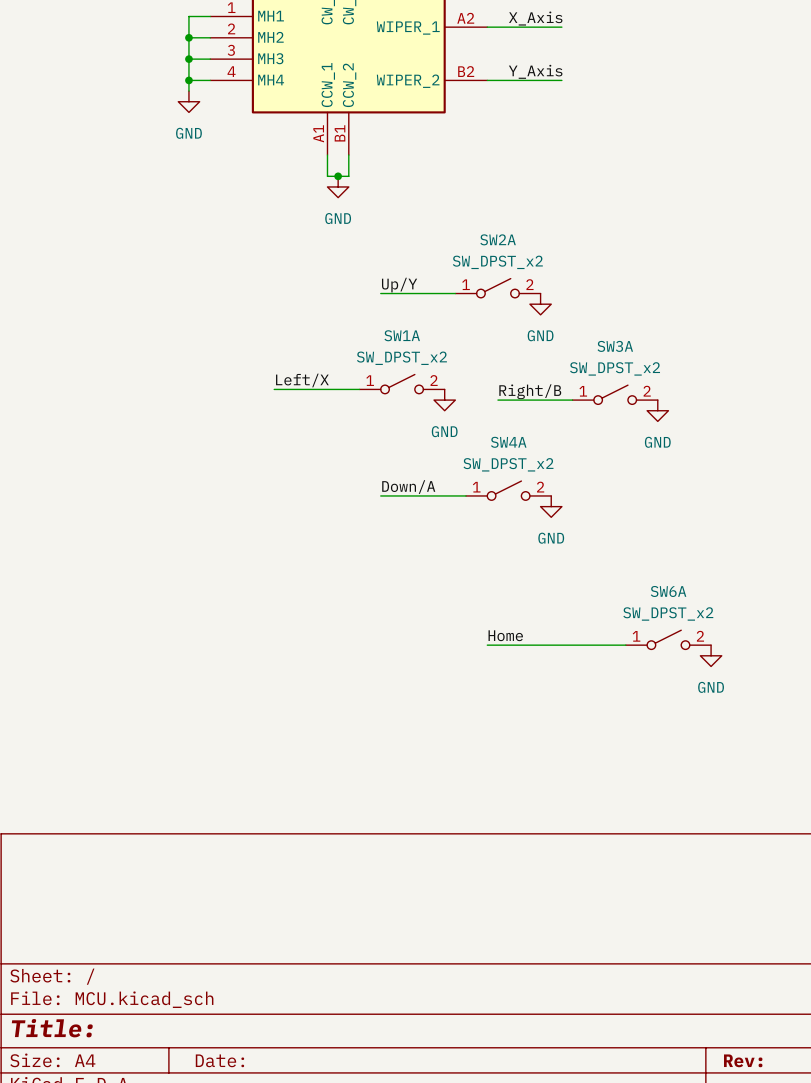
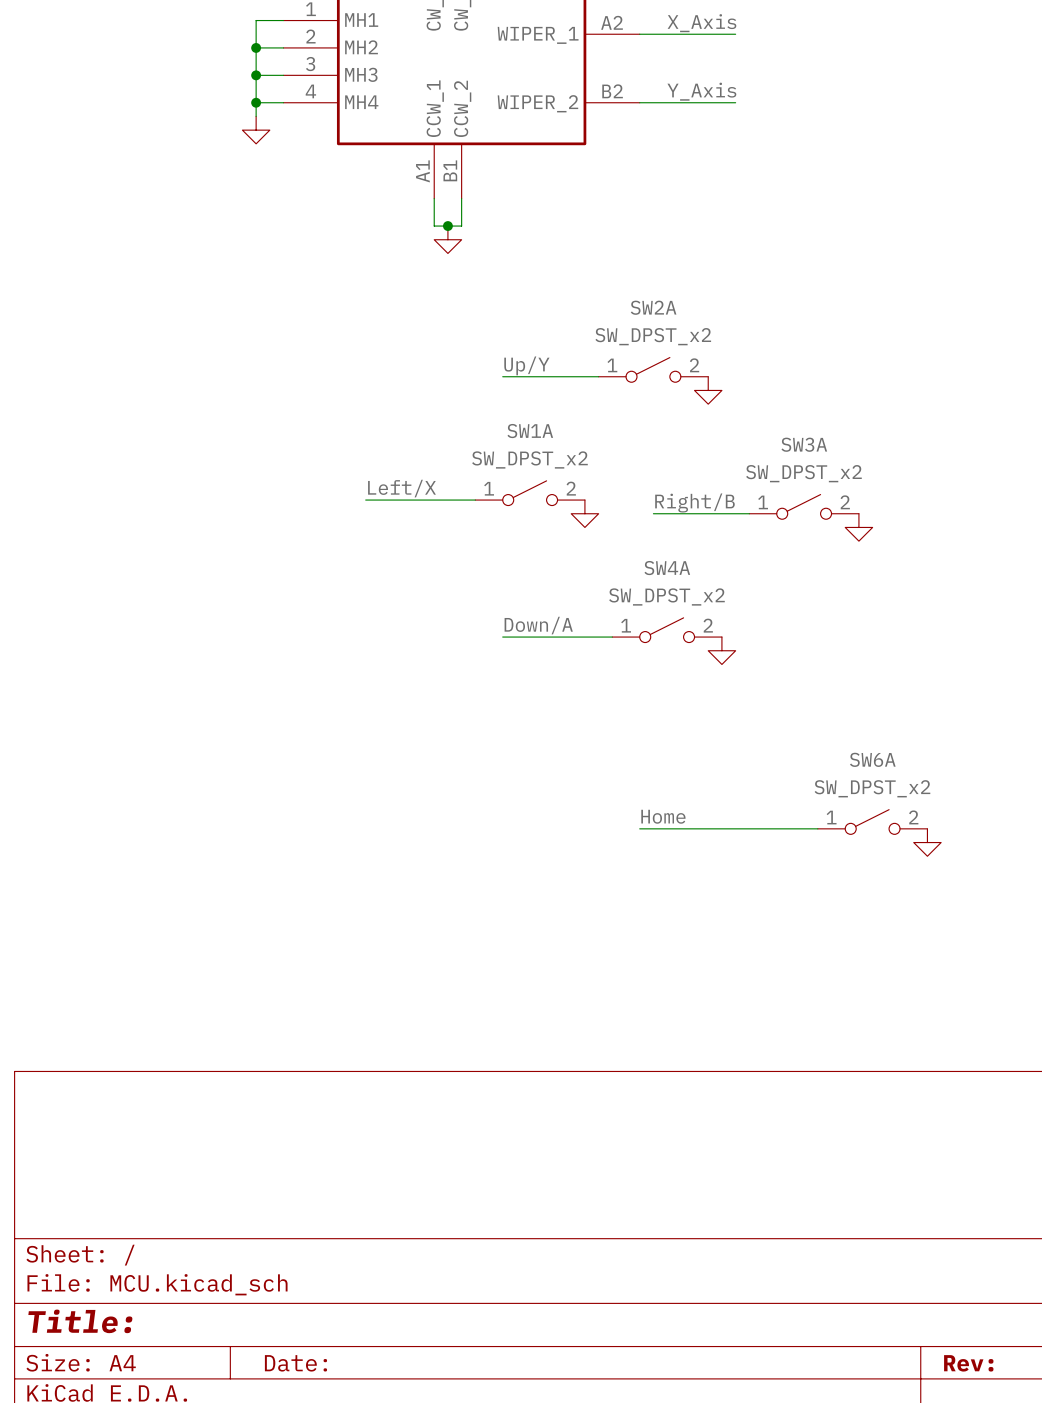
power symbol text: GND (188, 133) -> none
power symbol text: GND (338, 218) -> none
power symbol text: GND (540, 335) -> none
power symbol text: GND (444, 431) -> none
power symbol text: GND (657, 442) -> none
power symbol text: GND (551, 538) -> none
power symbol text: GND (711, 687) -> none

